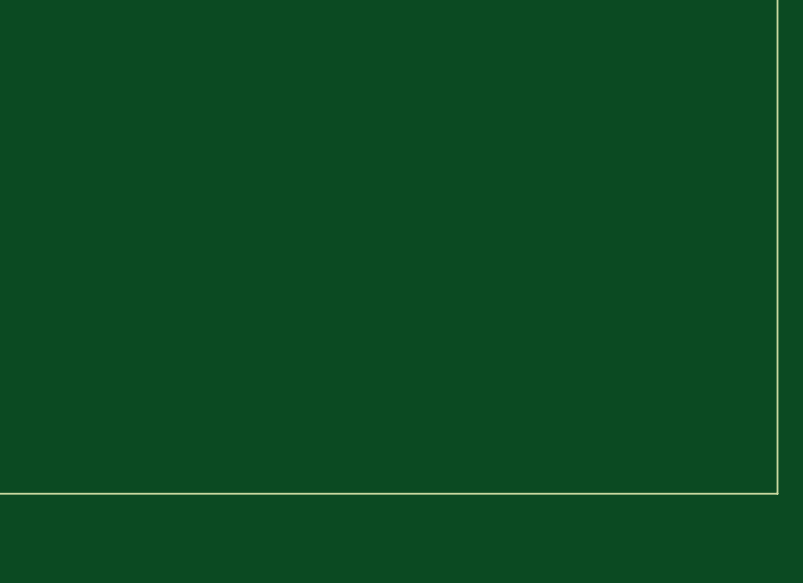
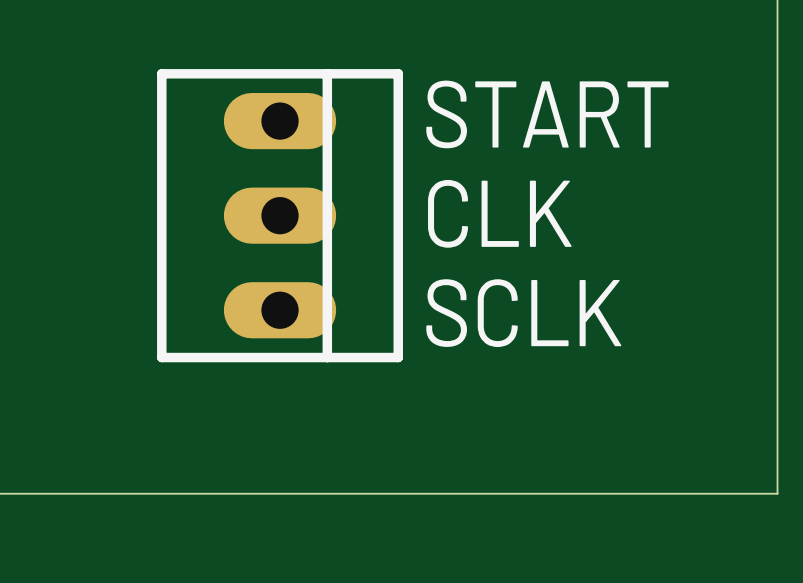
text: none -> START (547, 114)
text: none -> CLK (499, 213)
part: none -> (280, 215)
text: none -> SCLK (523, 313)

